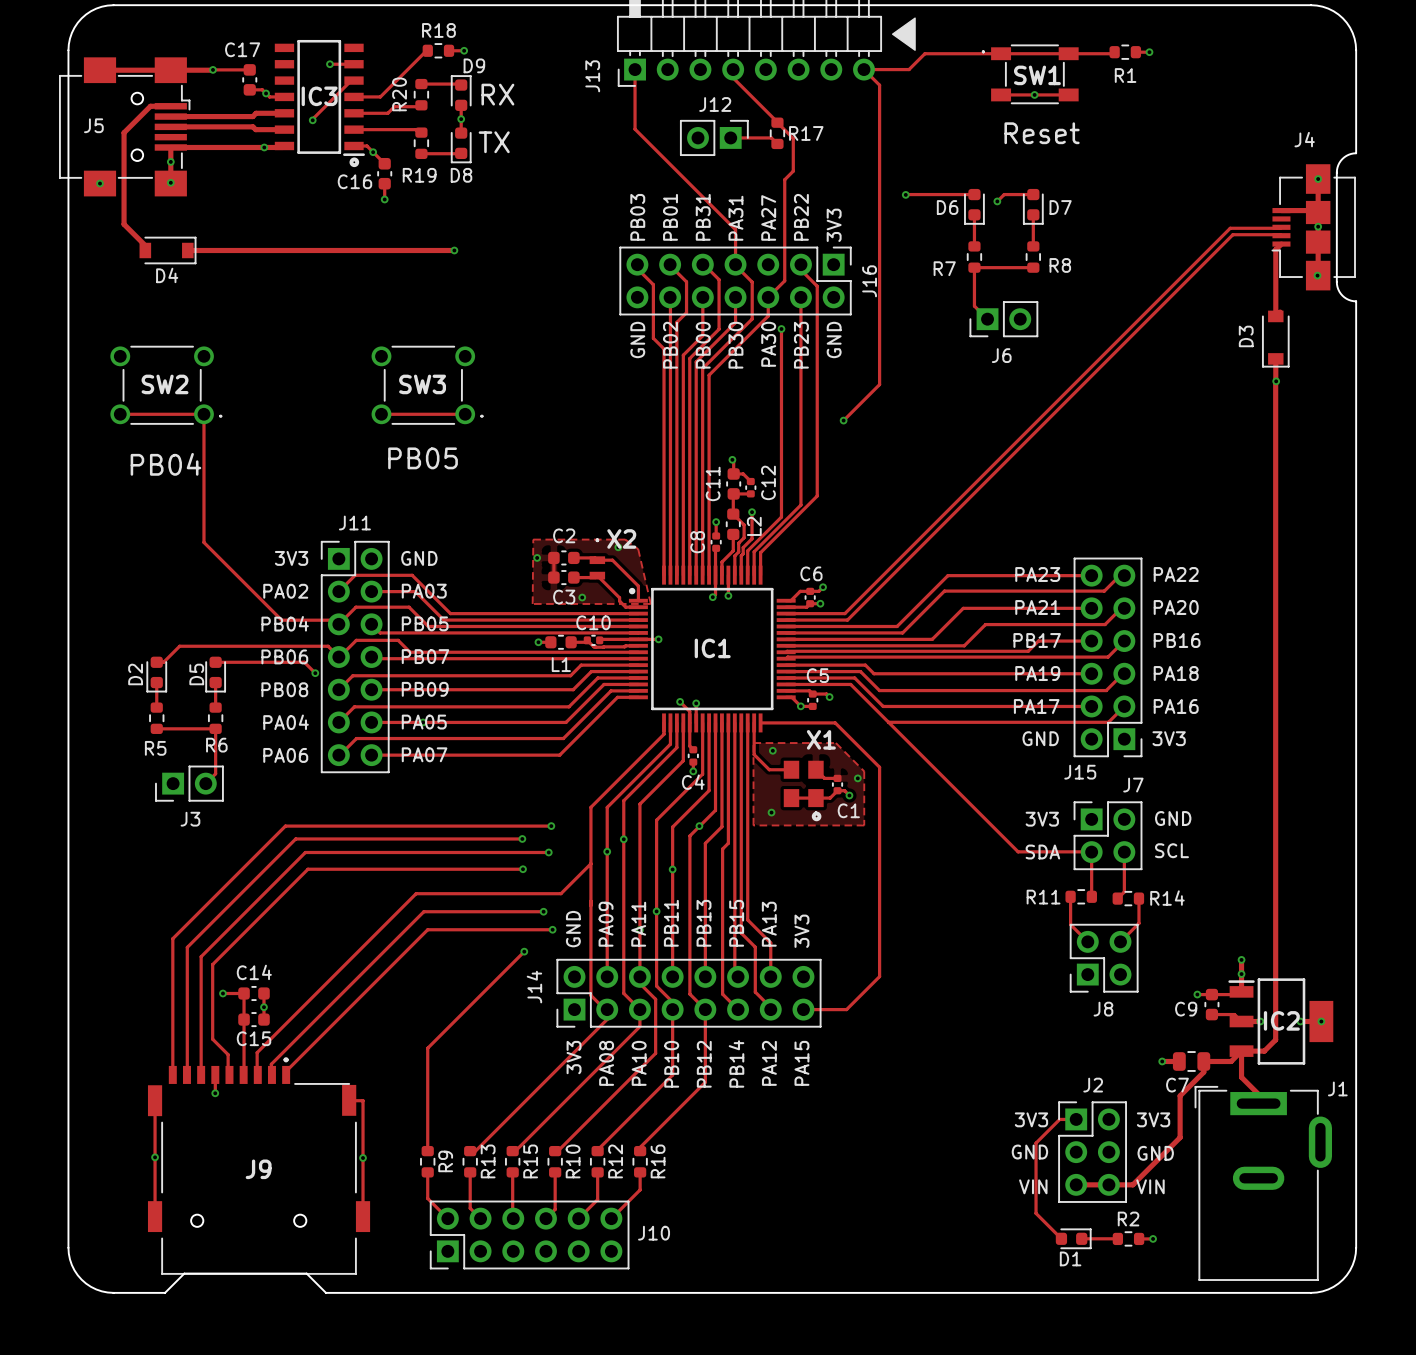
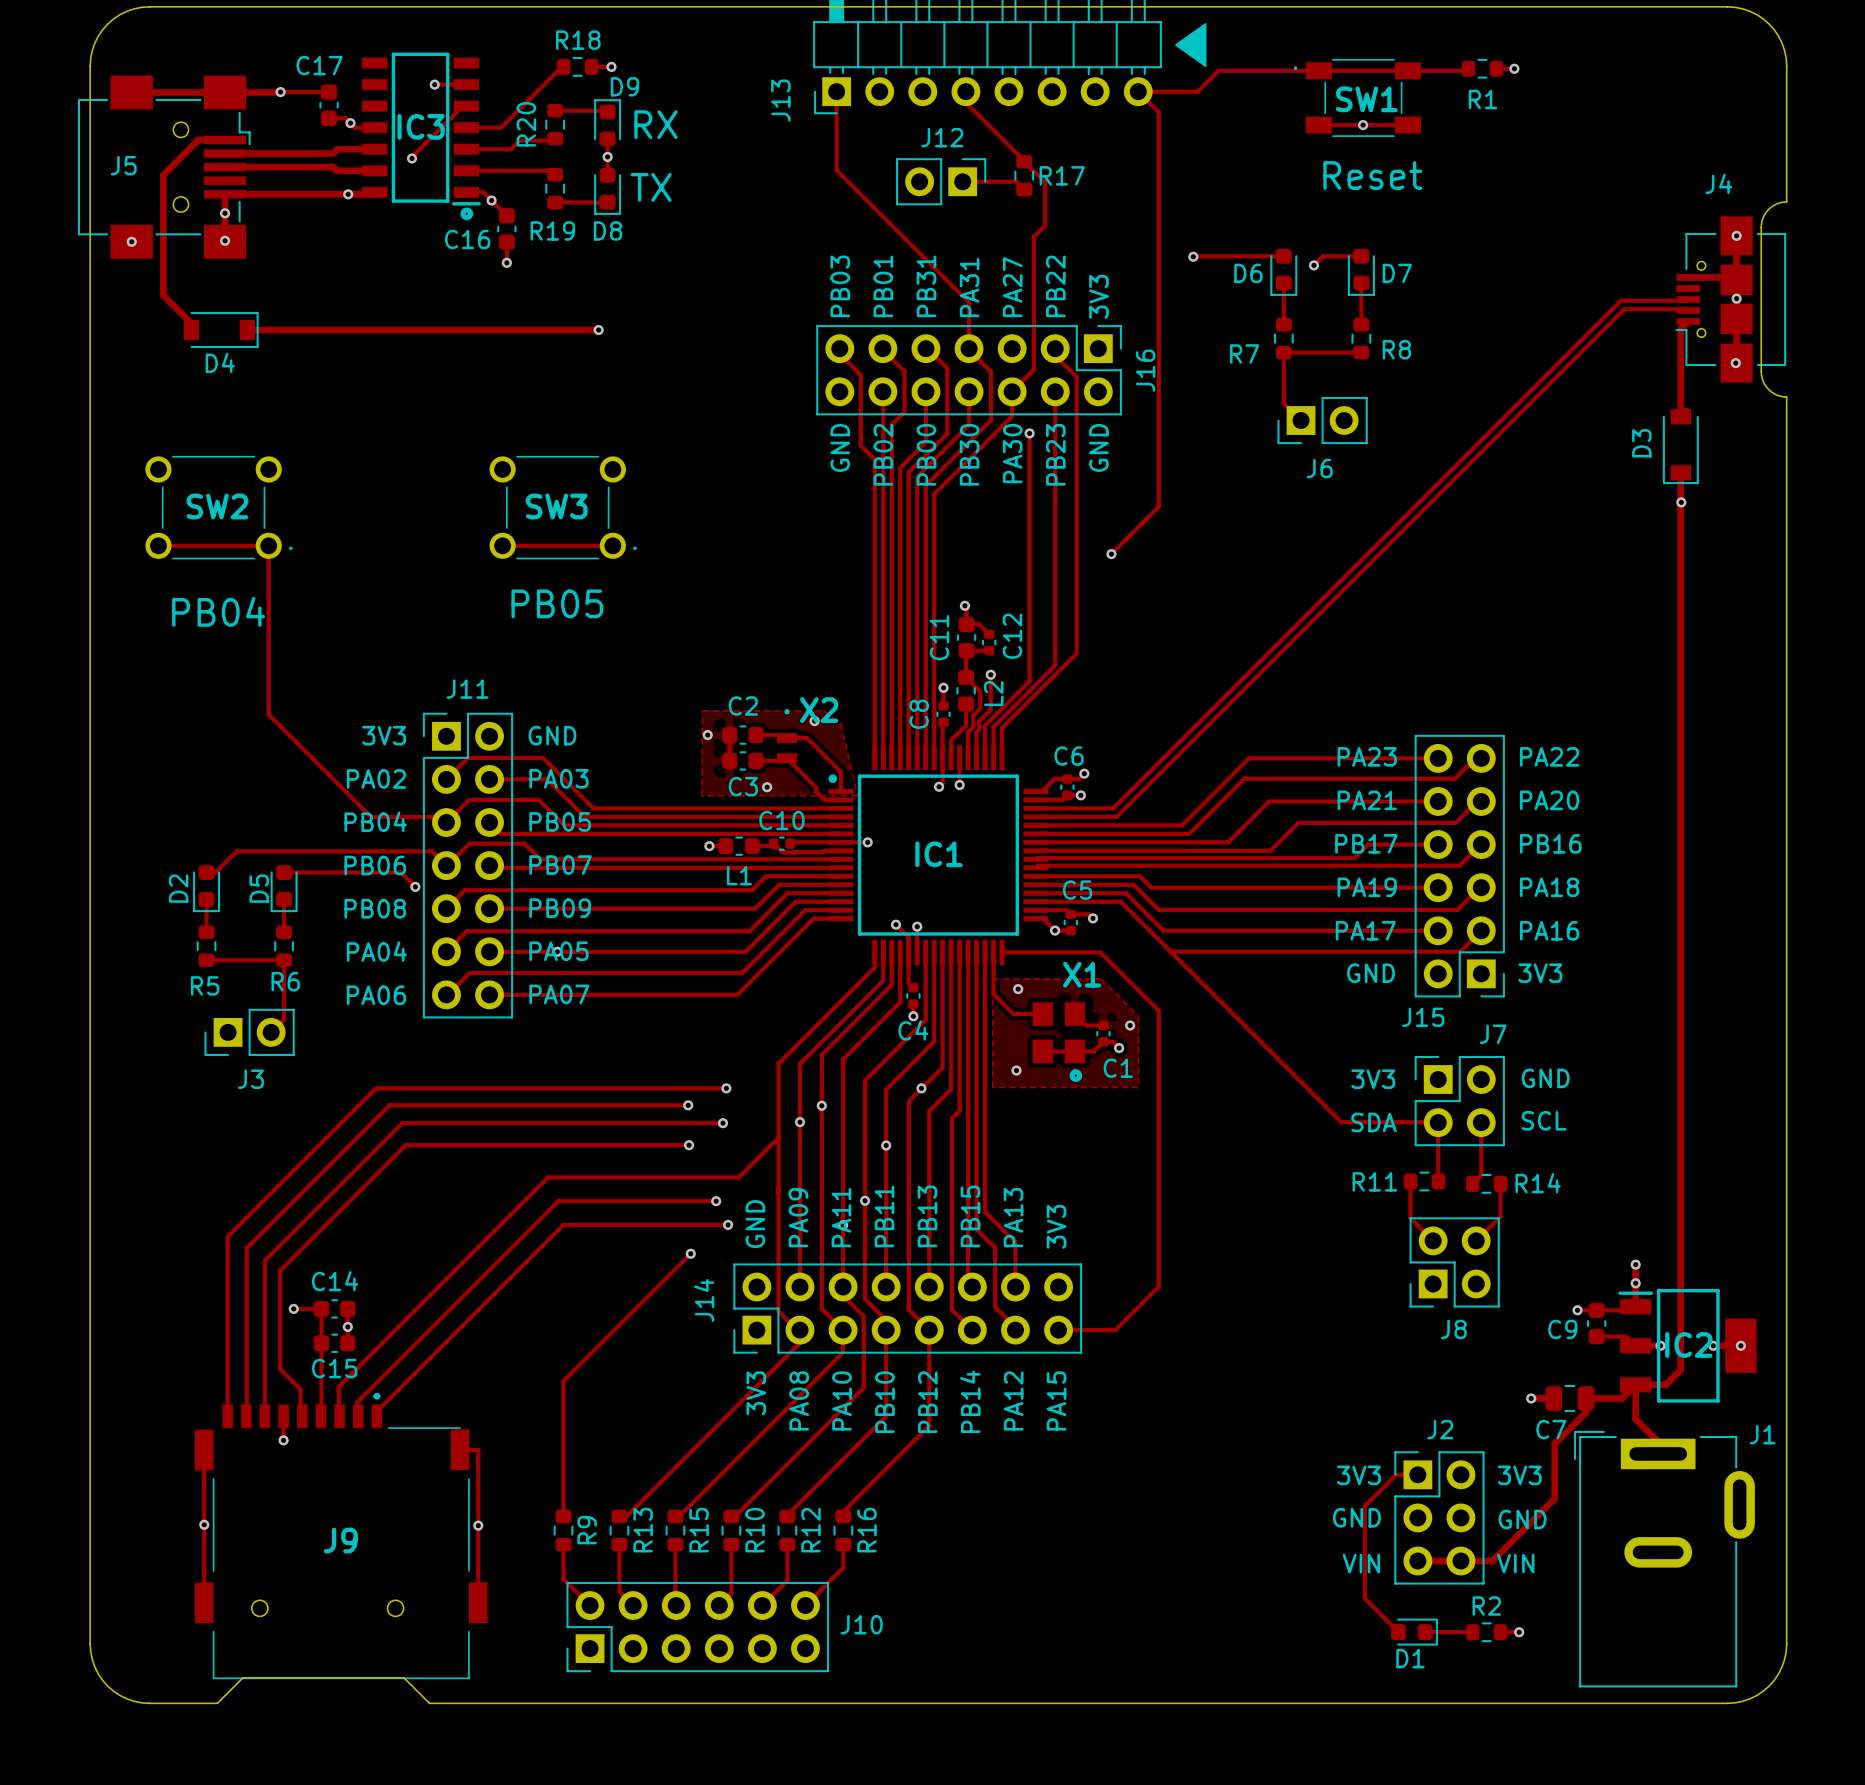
J4 footprint: [1271, 164, 1356, 291] -> [1675, 216, 1787, 383]

